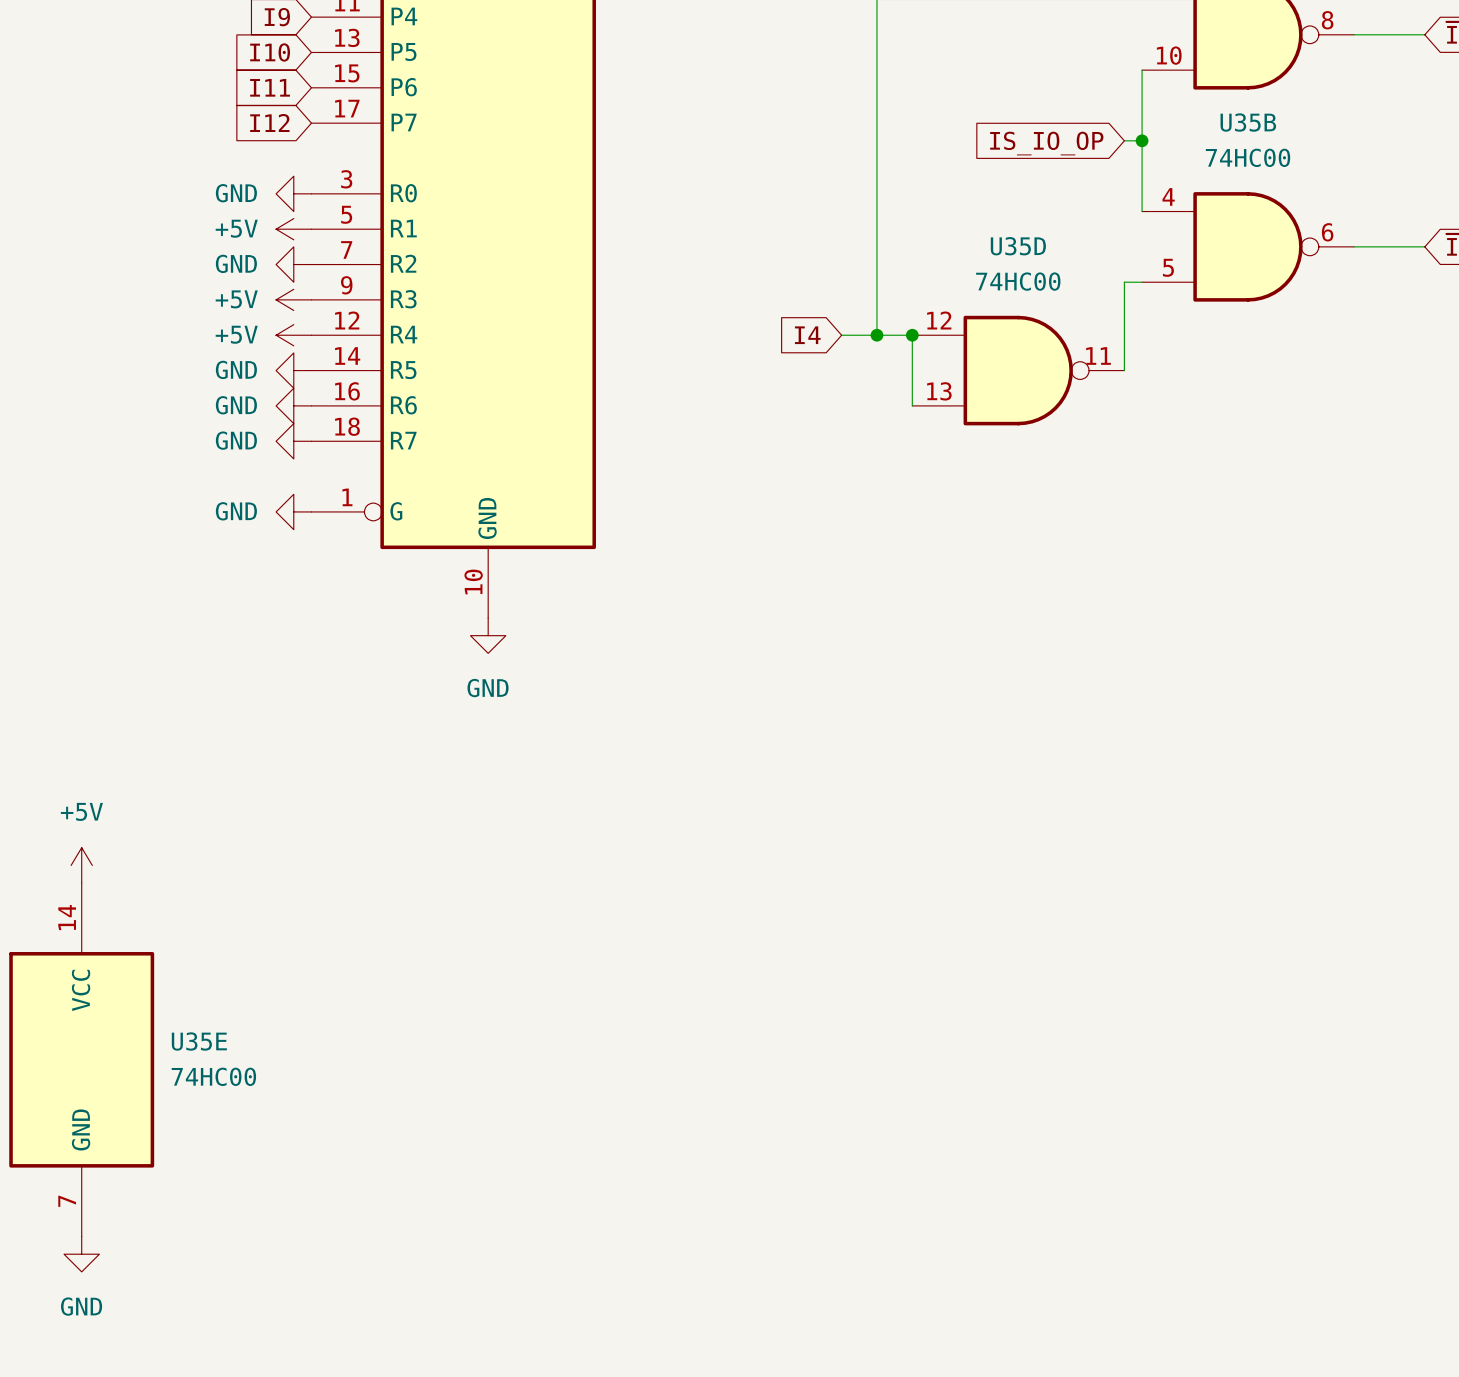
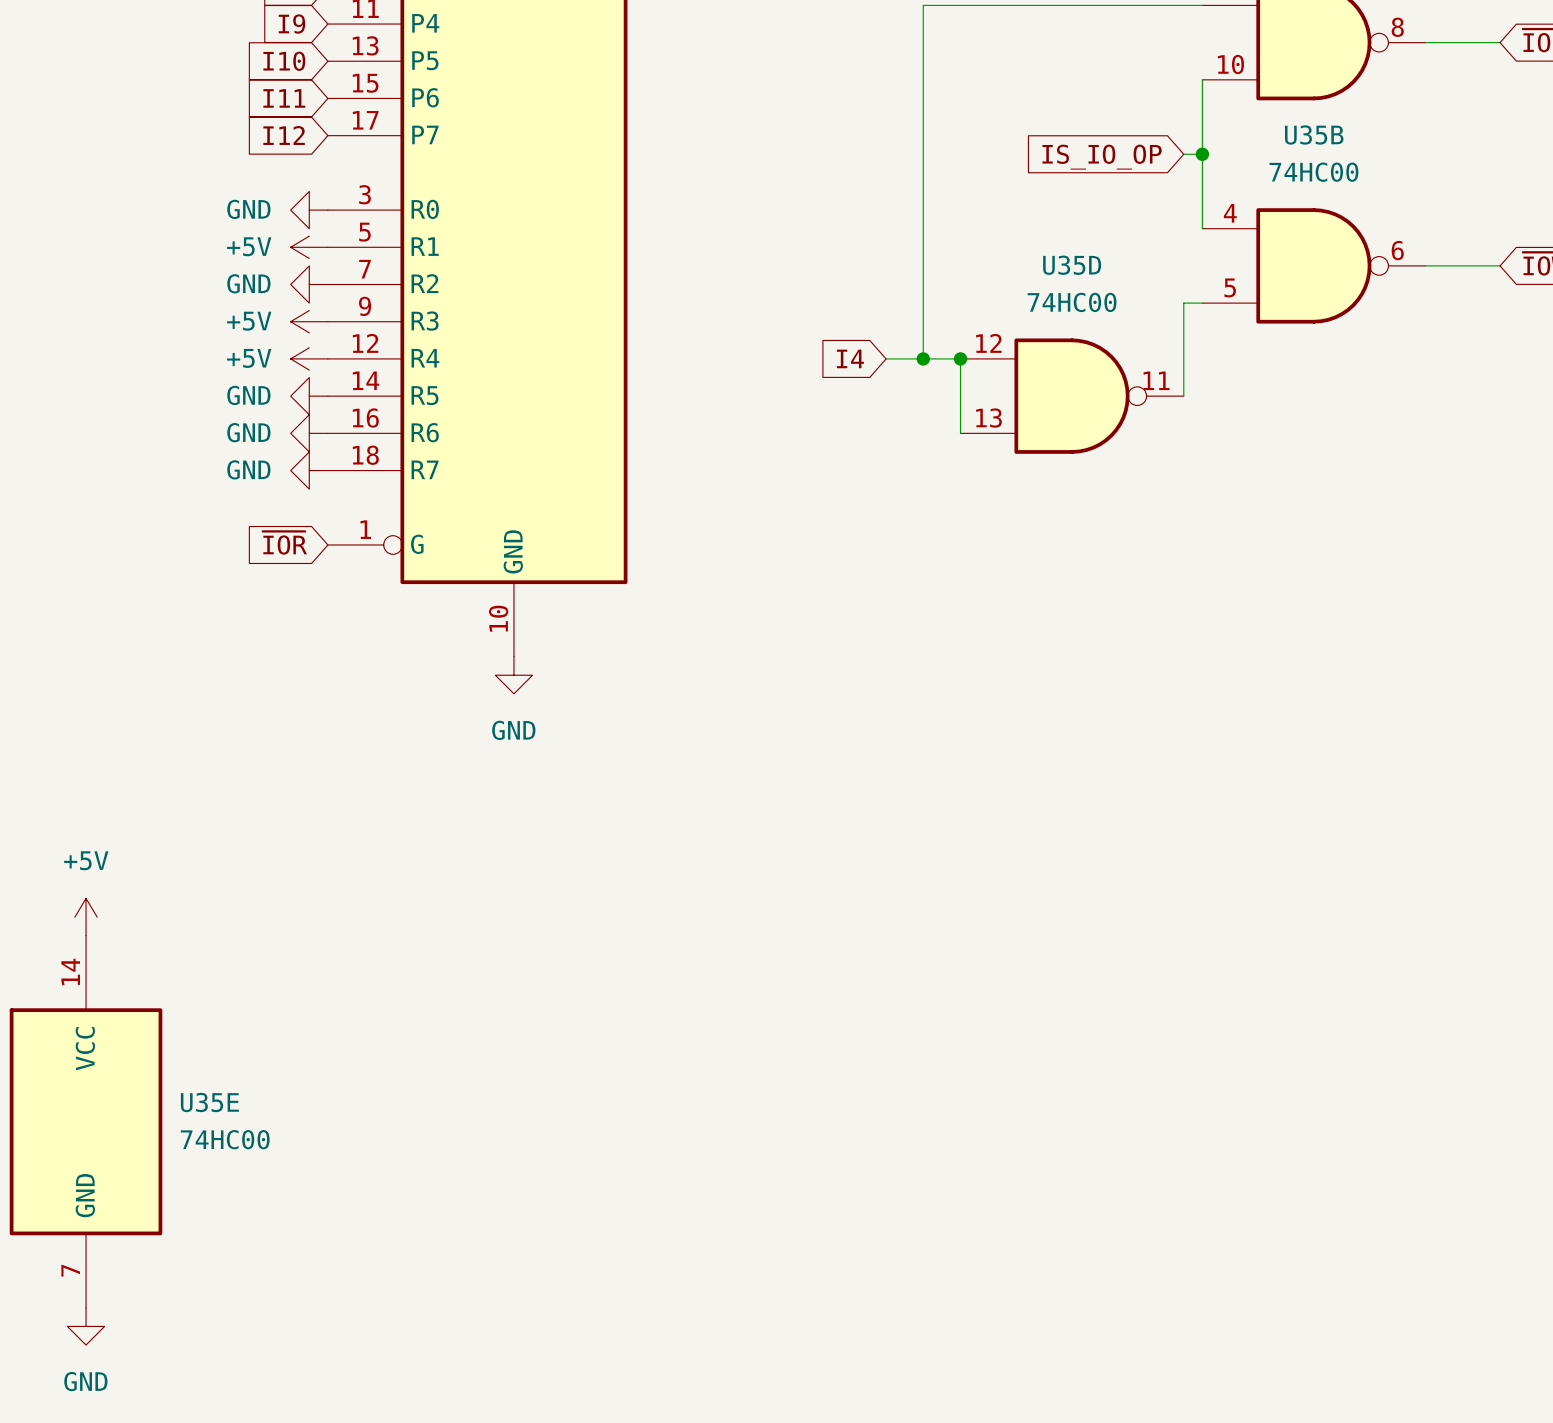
global label: none -> ~{IOR} (284, 543)
power symbol: GND (293, 511) -> none

